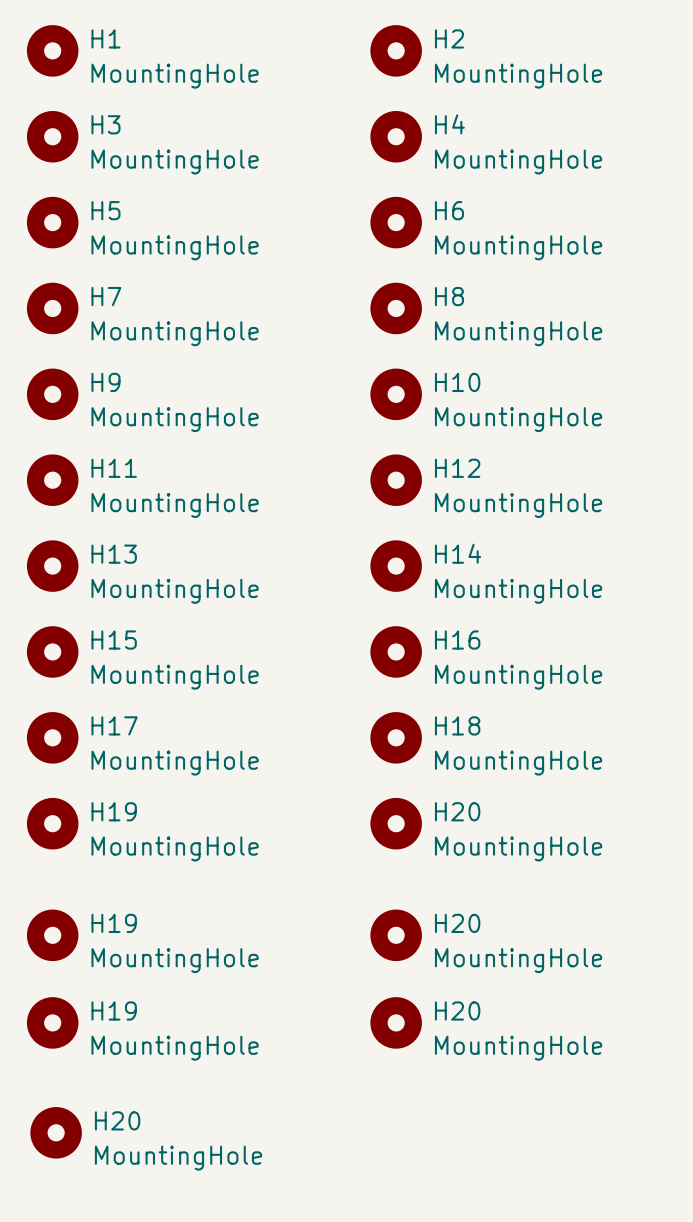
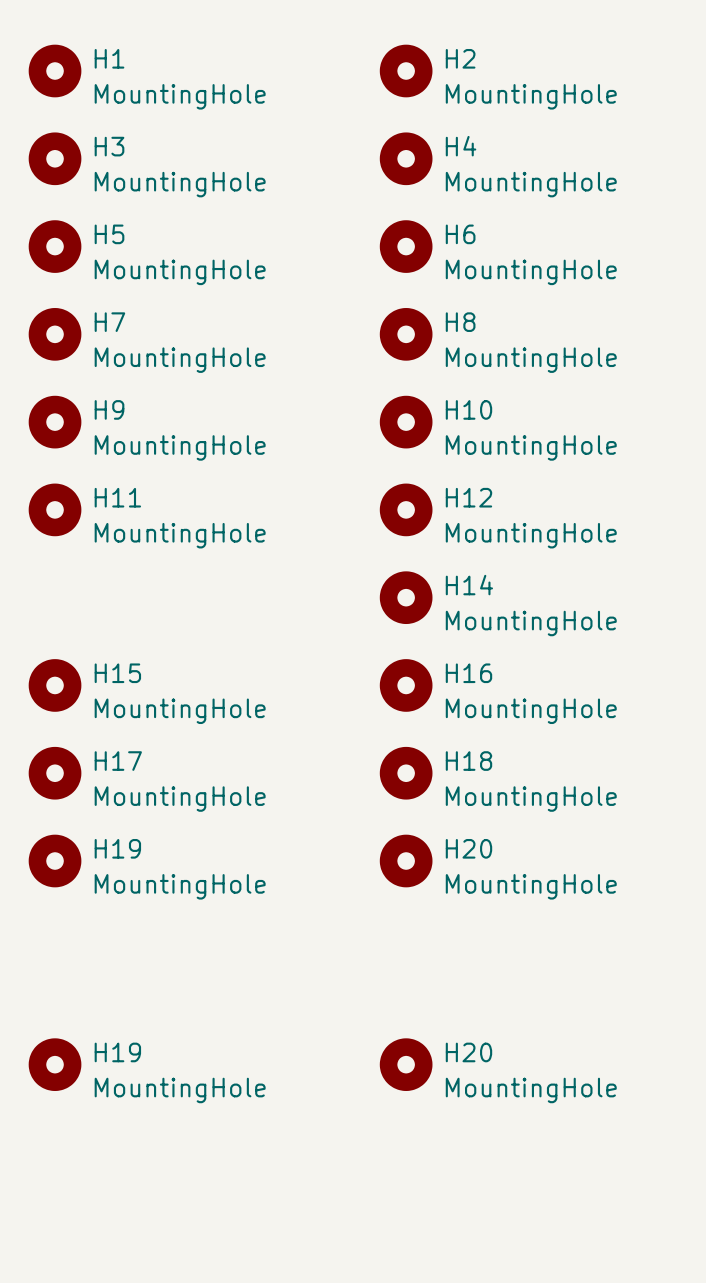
H13: MountingHole (52, 566) -> none
H19: MountingHole (52, 935) -> none
H20: MountingHole (396, 935) -> none
H20: MountingHole (56, 1132) -> none

